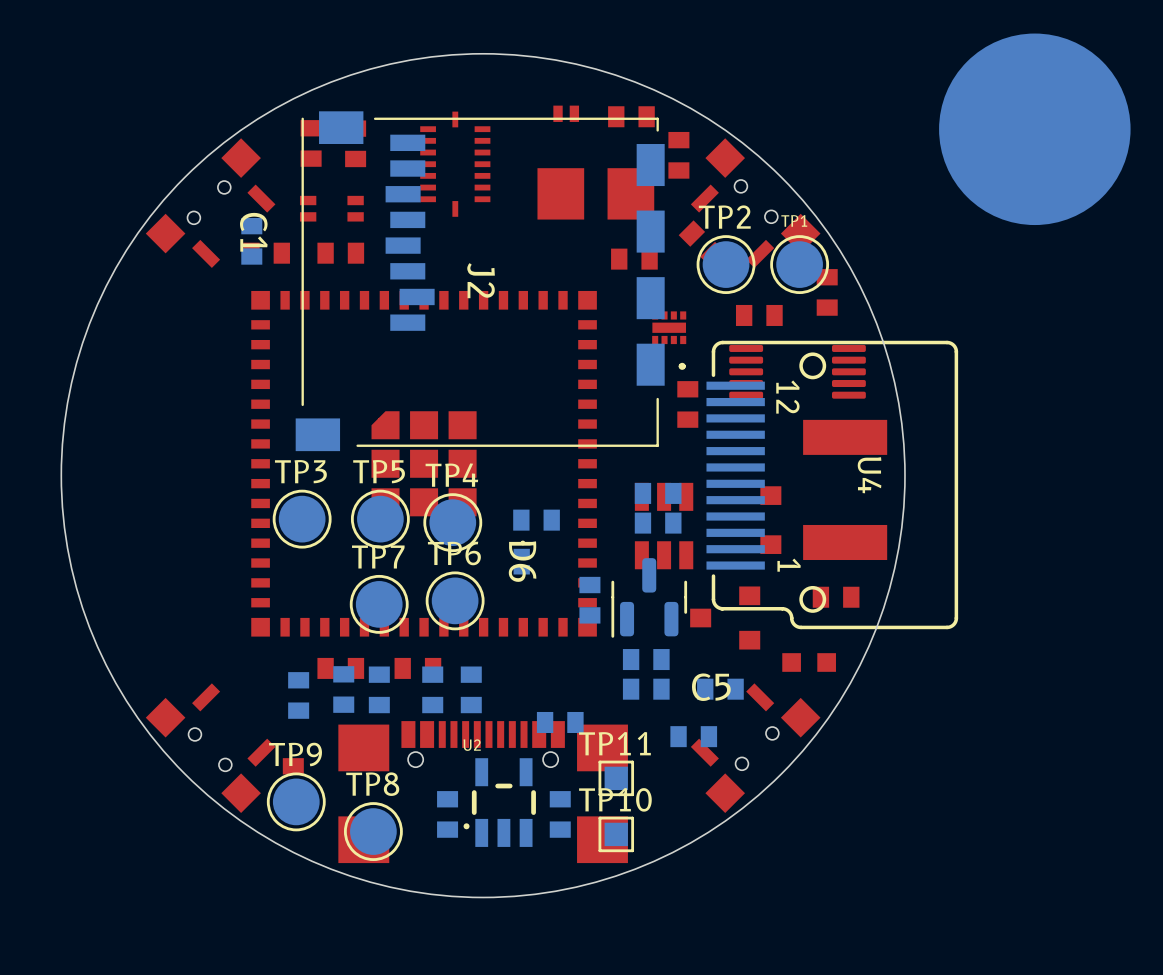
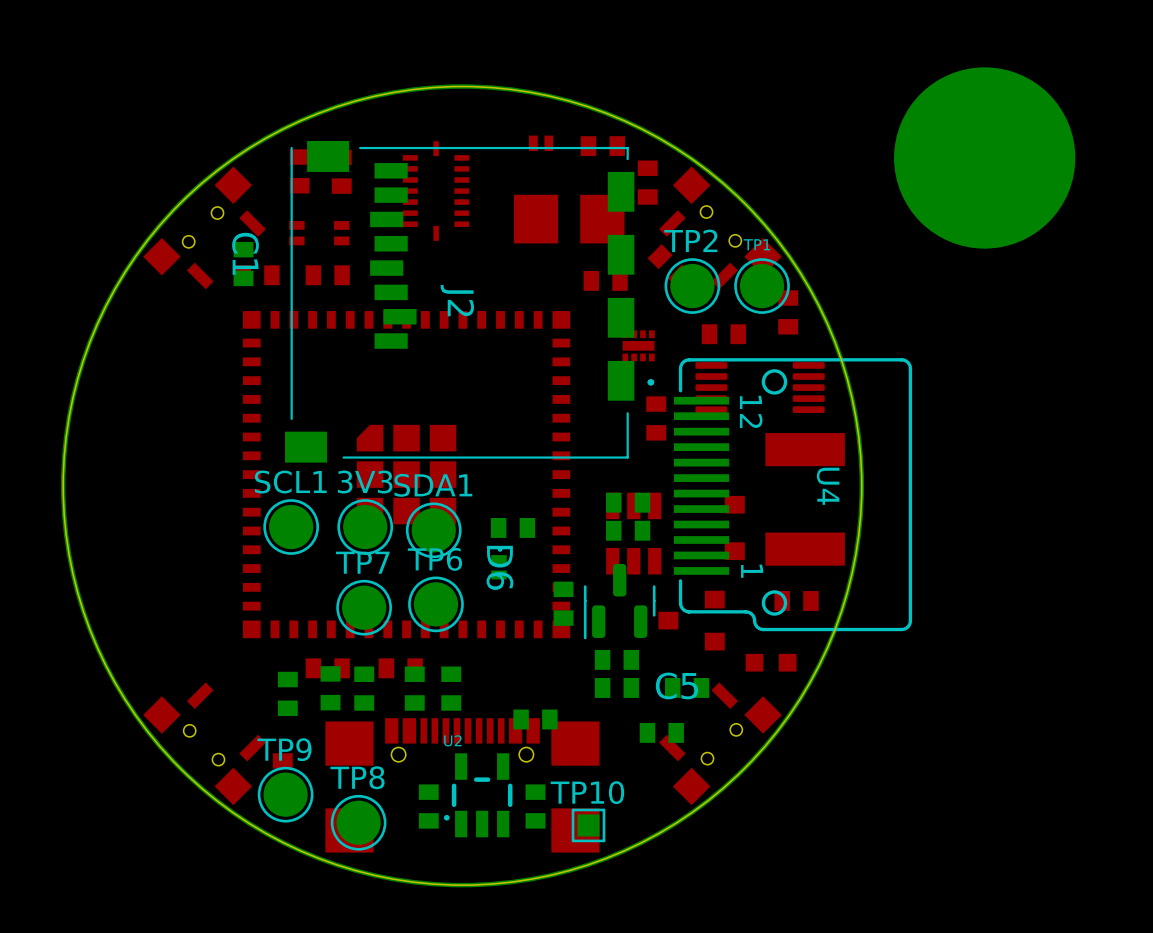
drawing: none -> [60, 84, 865, 888]
TP3 name: TP3 (300, 471) -> SCL1 (290, 482)
TP5 name: TP5 (379, 471) -> 3V3 (365, 482)
TP4 name: TP4 (451, 475) -> SDA1 (433, 485)
TP11: (616, 778) -> none

